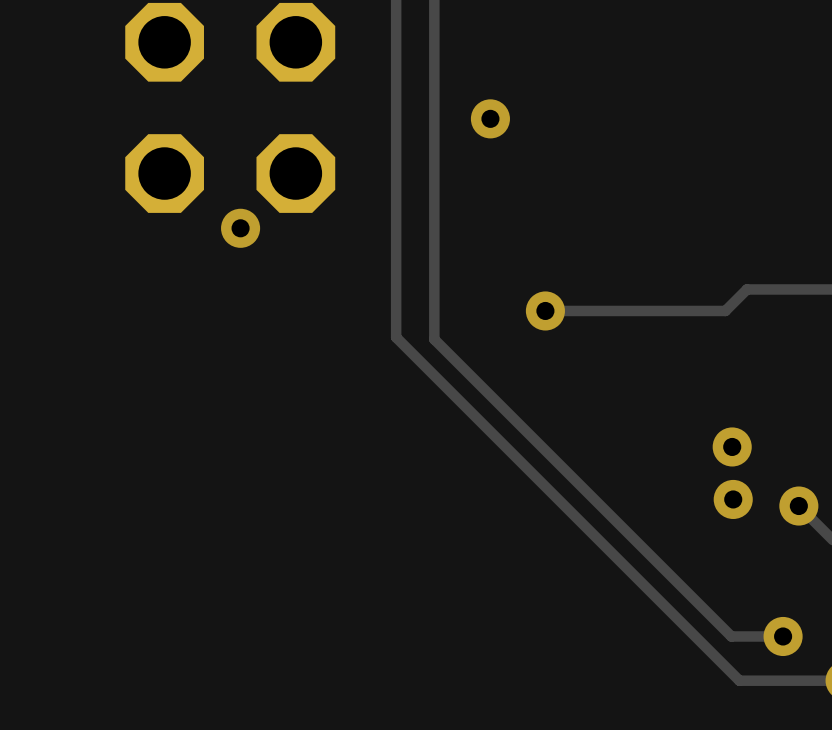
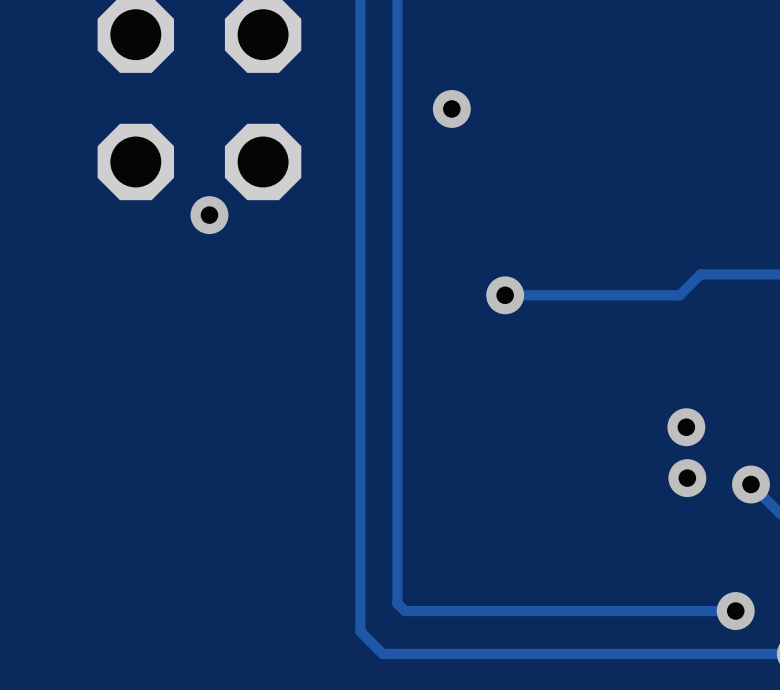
track: (396, 337) (739, 680) -> (360, 320) (360, 631) (382, 653) (693, 653)
track: (434, 339) (731, 636) -> (397, 322) (397, 603) (404, 611) (685, 611)

